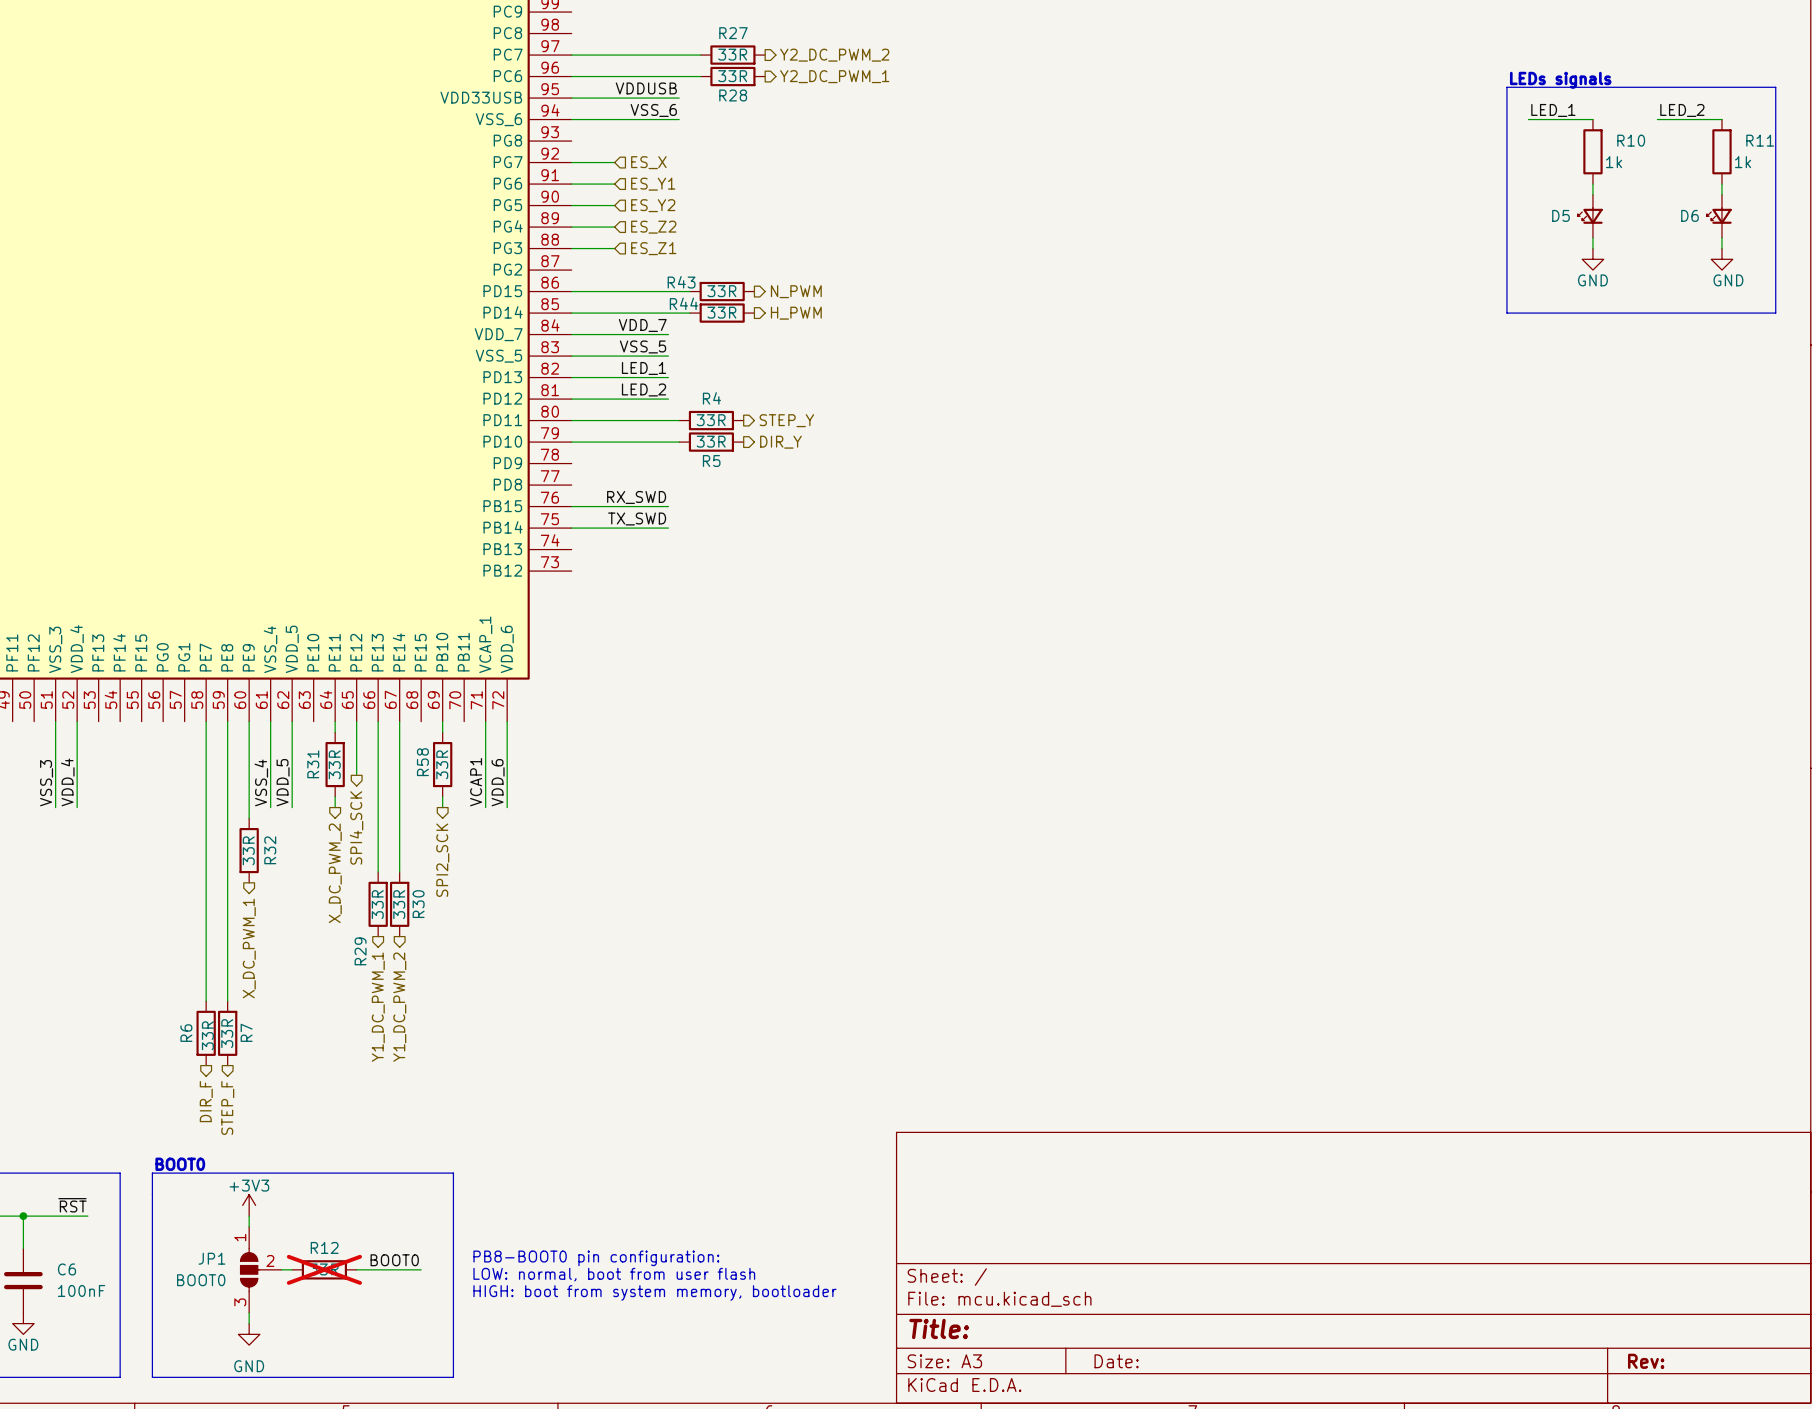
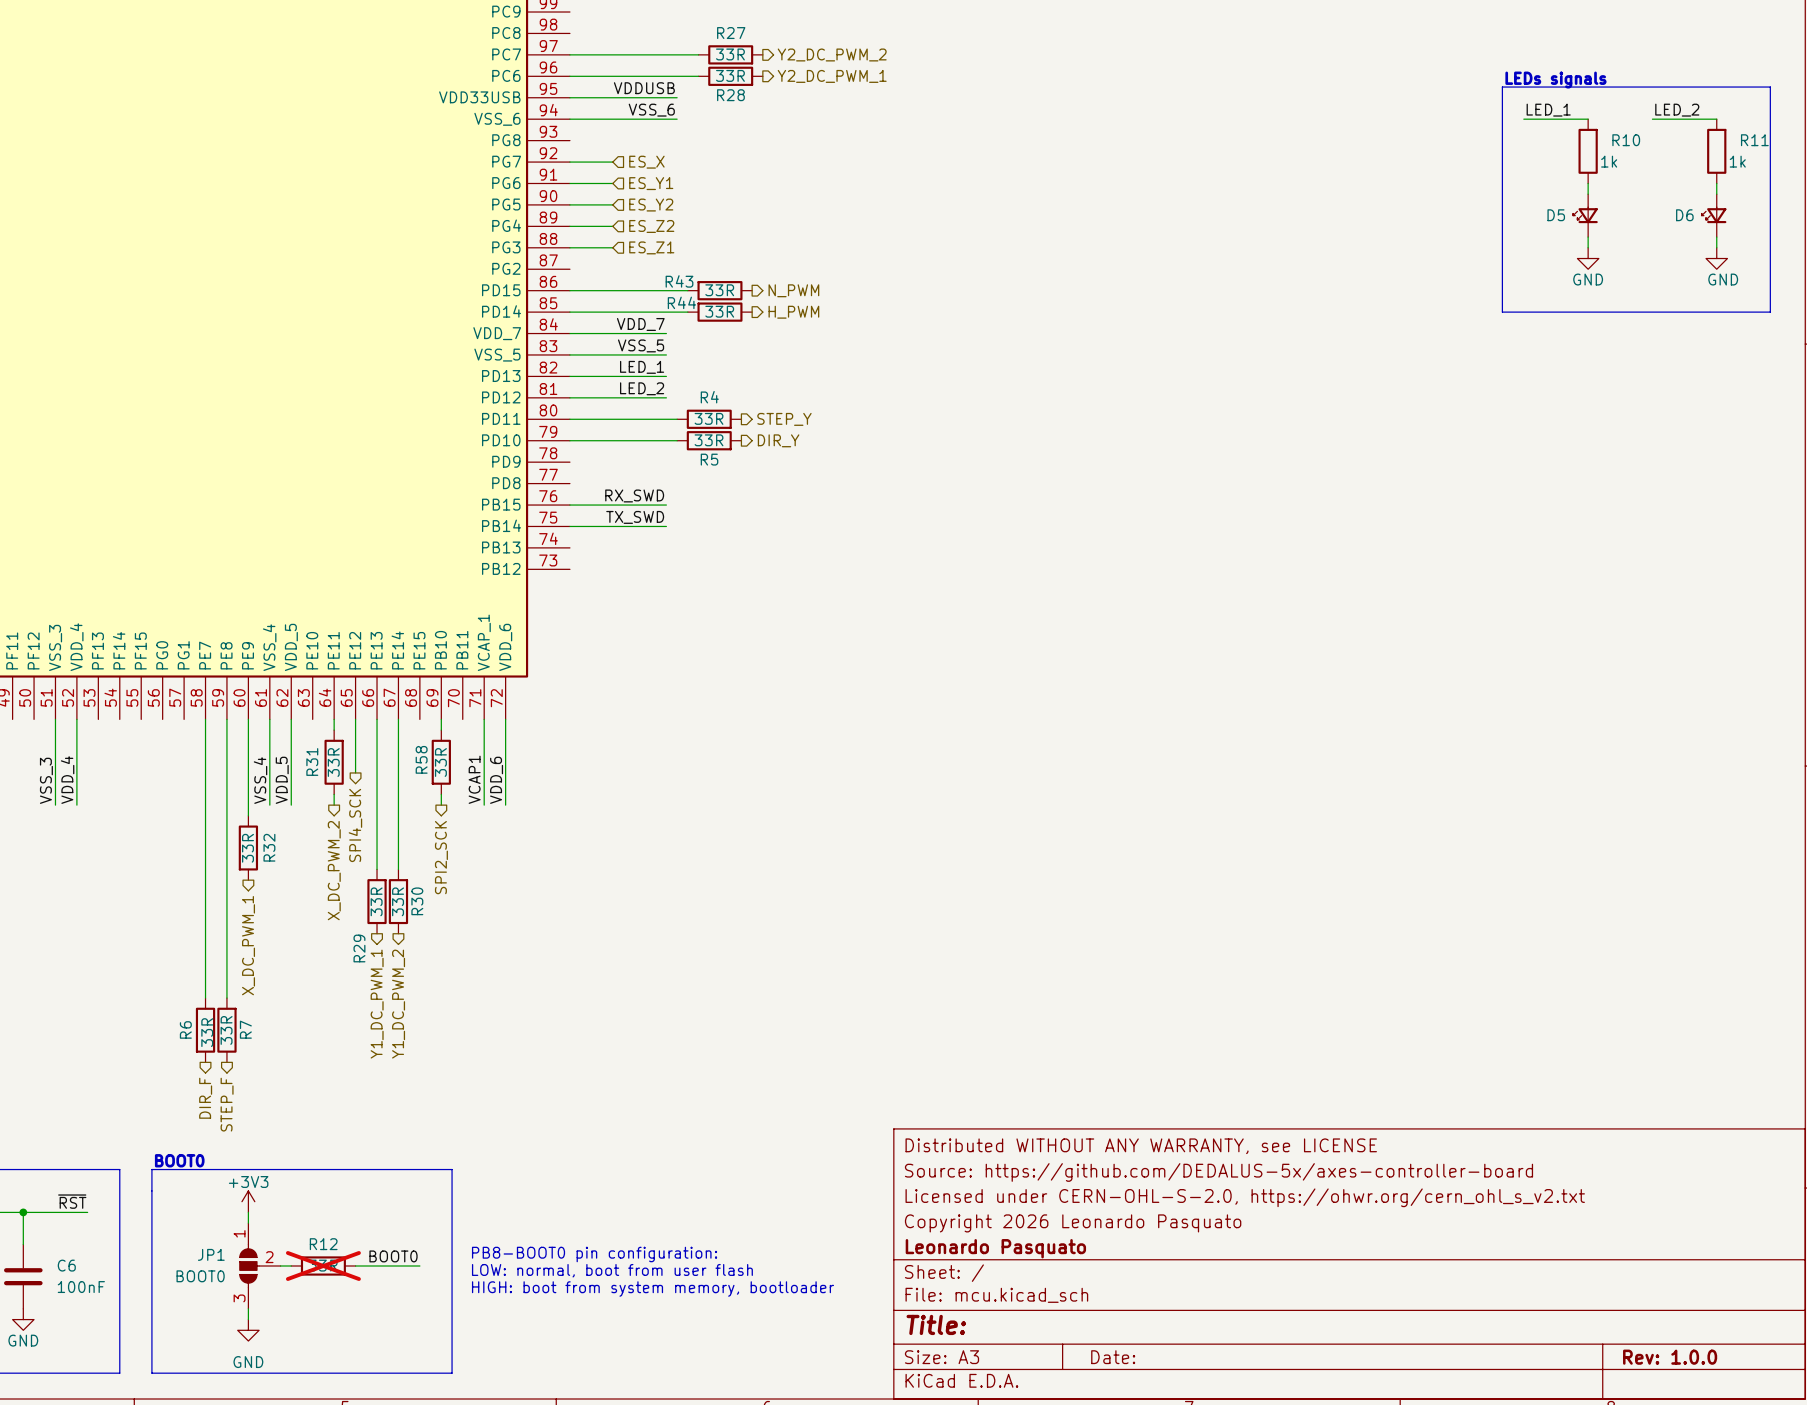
title block: none -> Distributed WITHOUT ANY WARRANTY, see LICENSE (1141, 1146)
title block: none -> Source: https://github.com/DEDALUS-5x/axes-controller-board (1218, 1172)
title block: none -> Licensed under CERN-OHL-S-2.0, https://ohwr.org/cern_ohl_s_v2.txt (1245, 1197)
title block: none -> Copyright 2026 Leonardo Pasquato (1073, 1223)
title block: none -> Leonardo Pasquato (995, 1248)
title block: Rev: (1646, 1361) -> Rev: 1.0.0 (1670, 1357)

